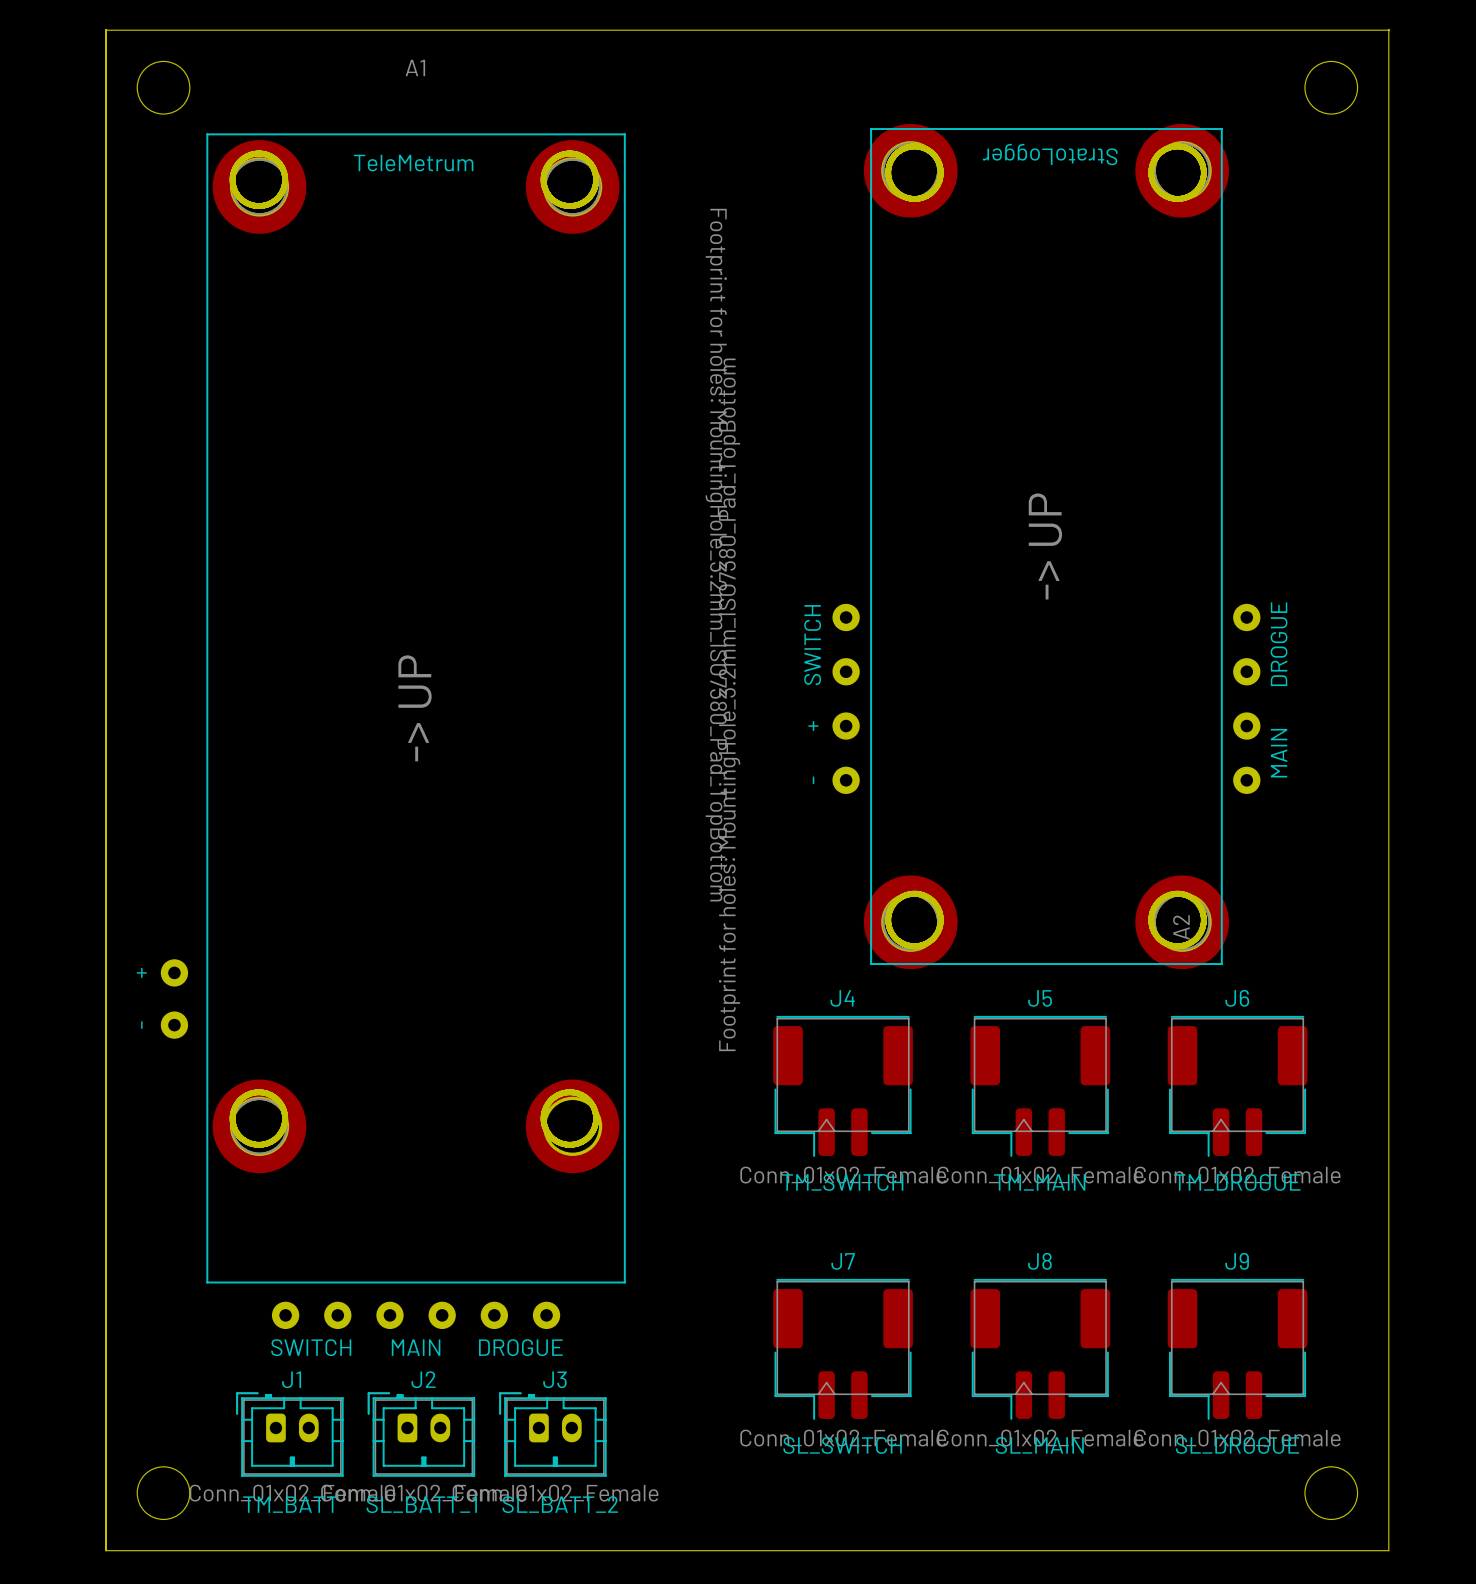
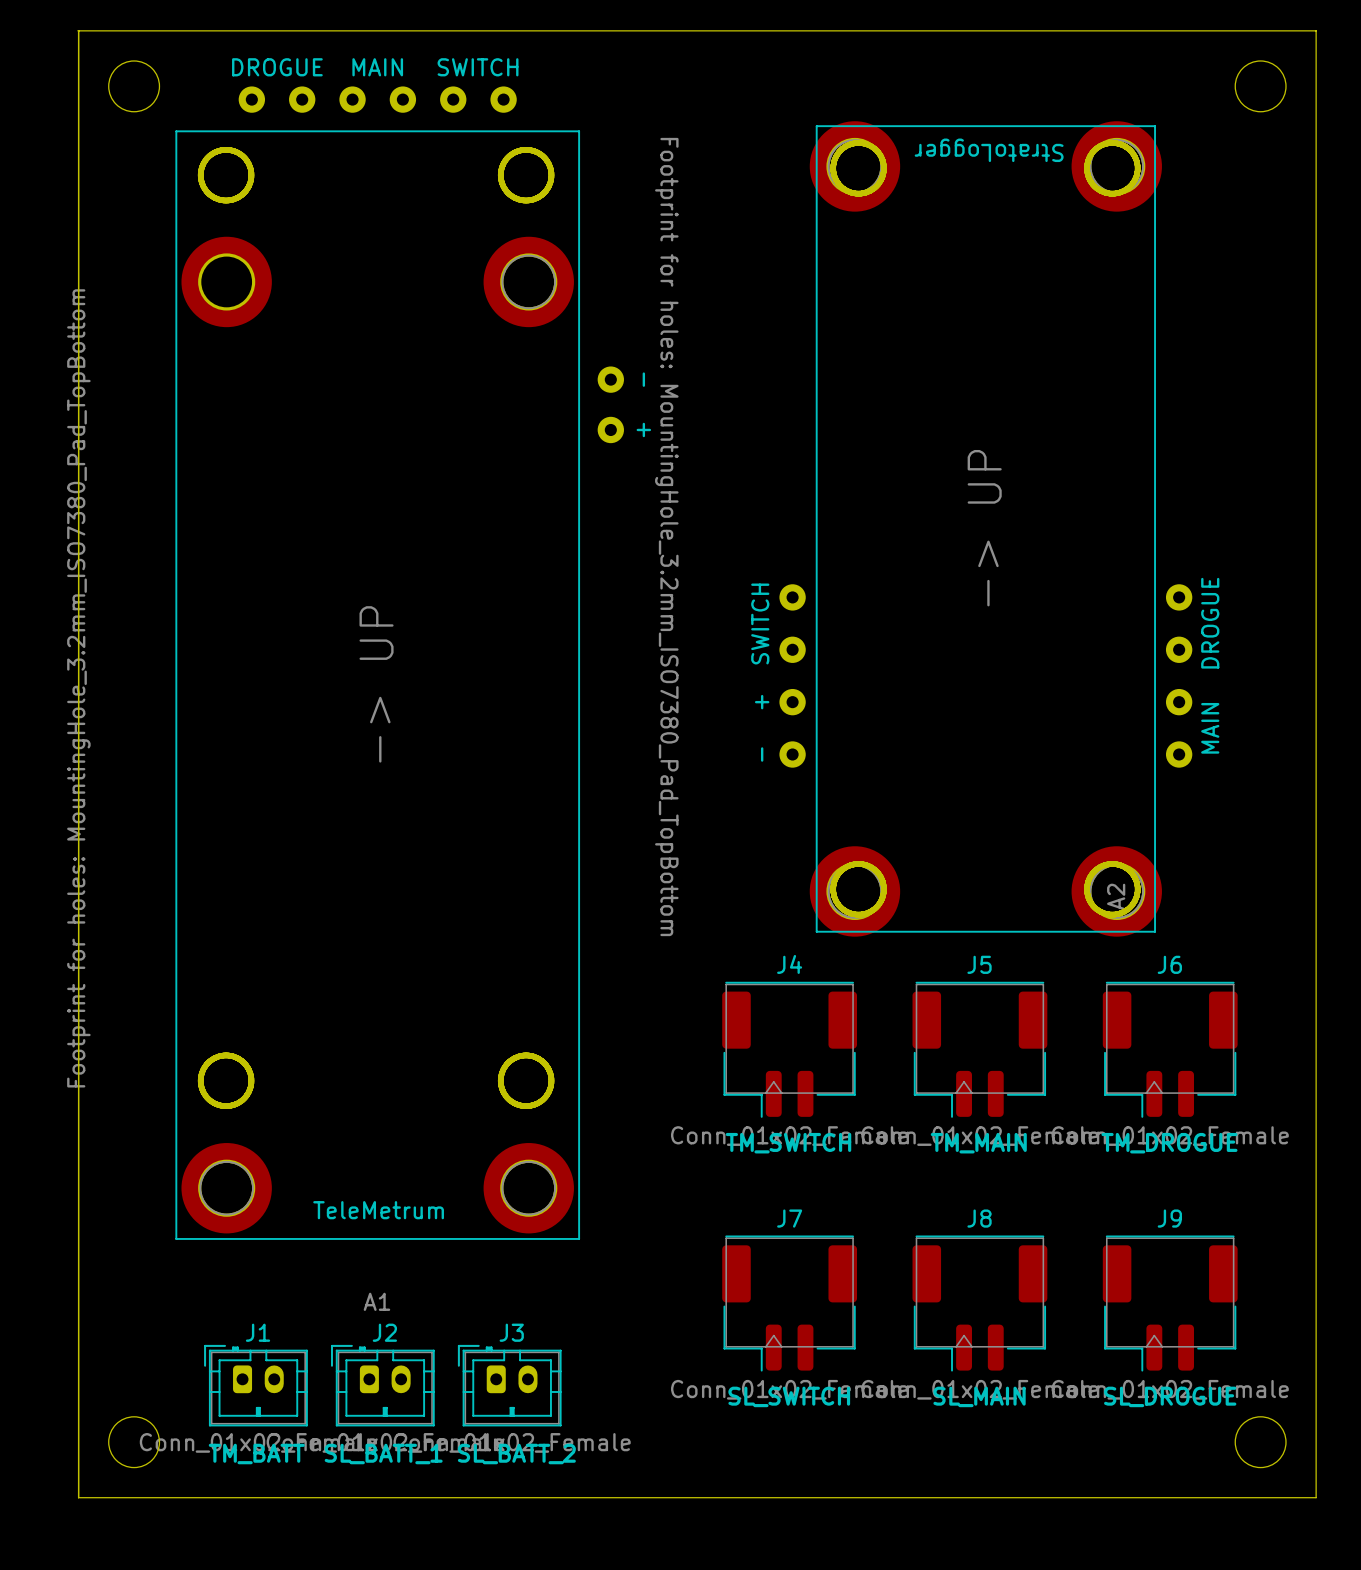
A1 rotation: 0° (393, 731) -> 180° (399, 663)

